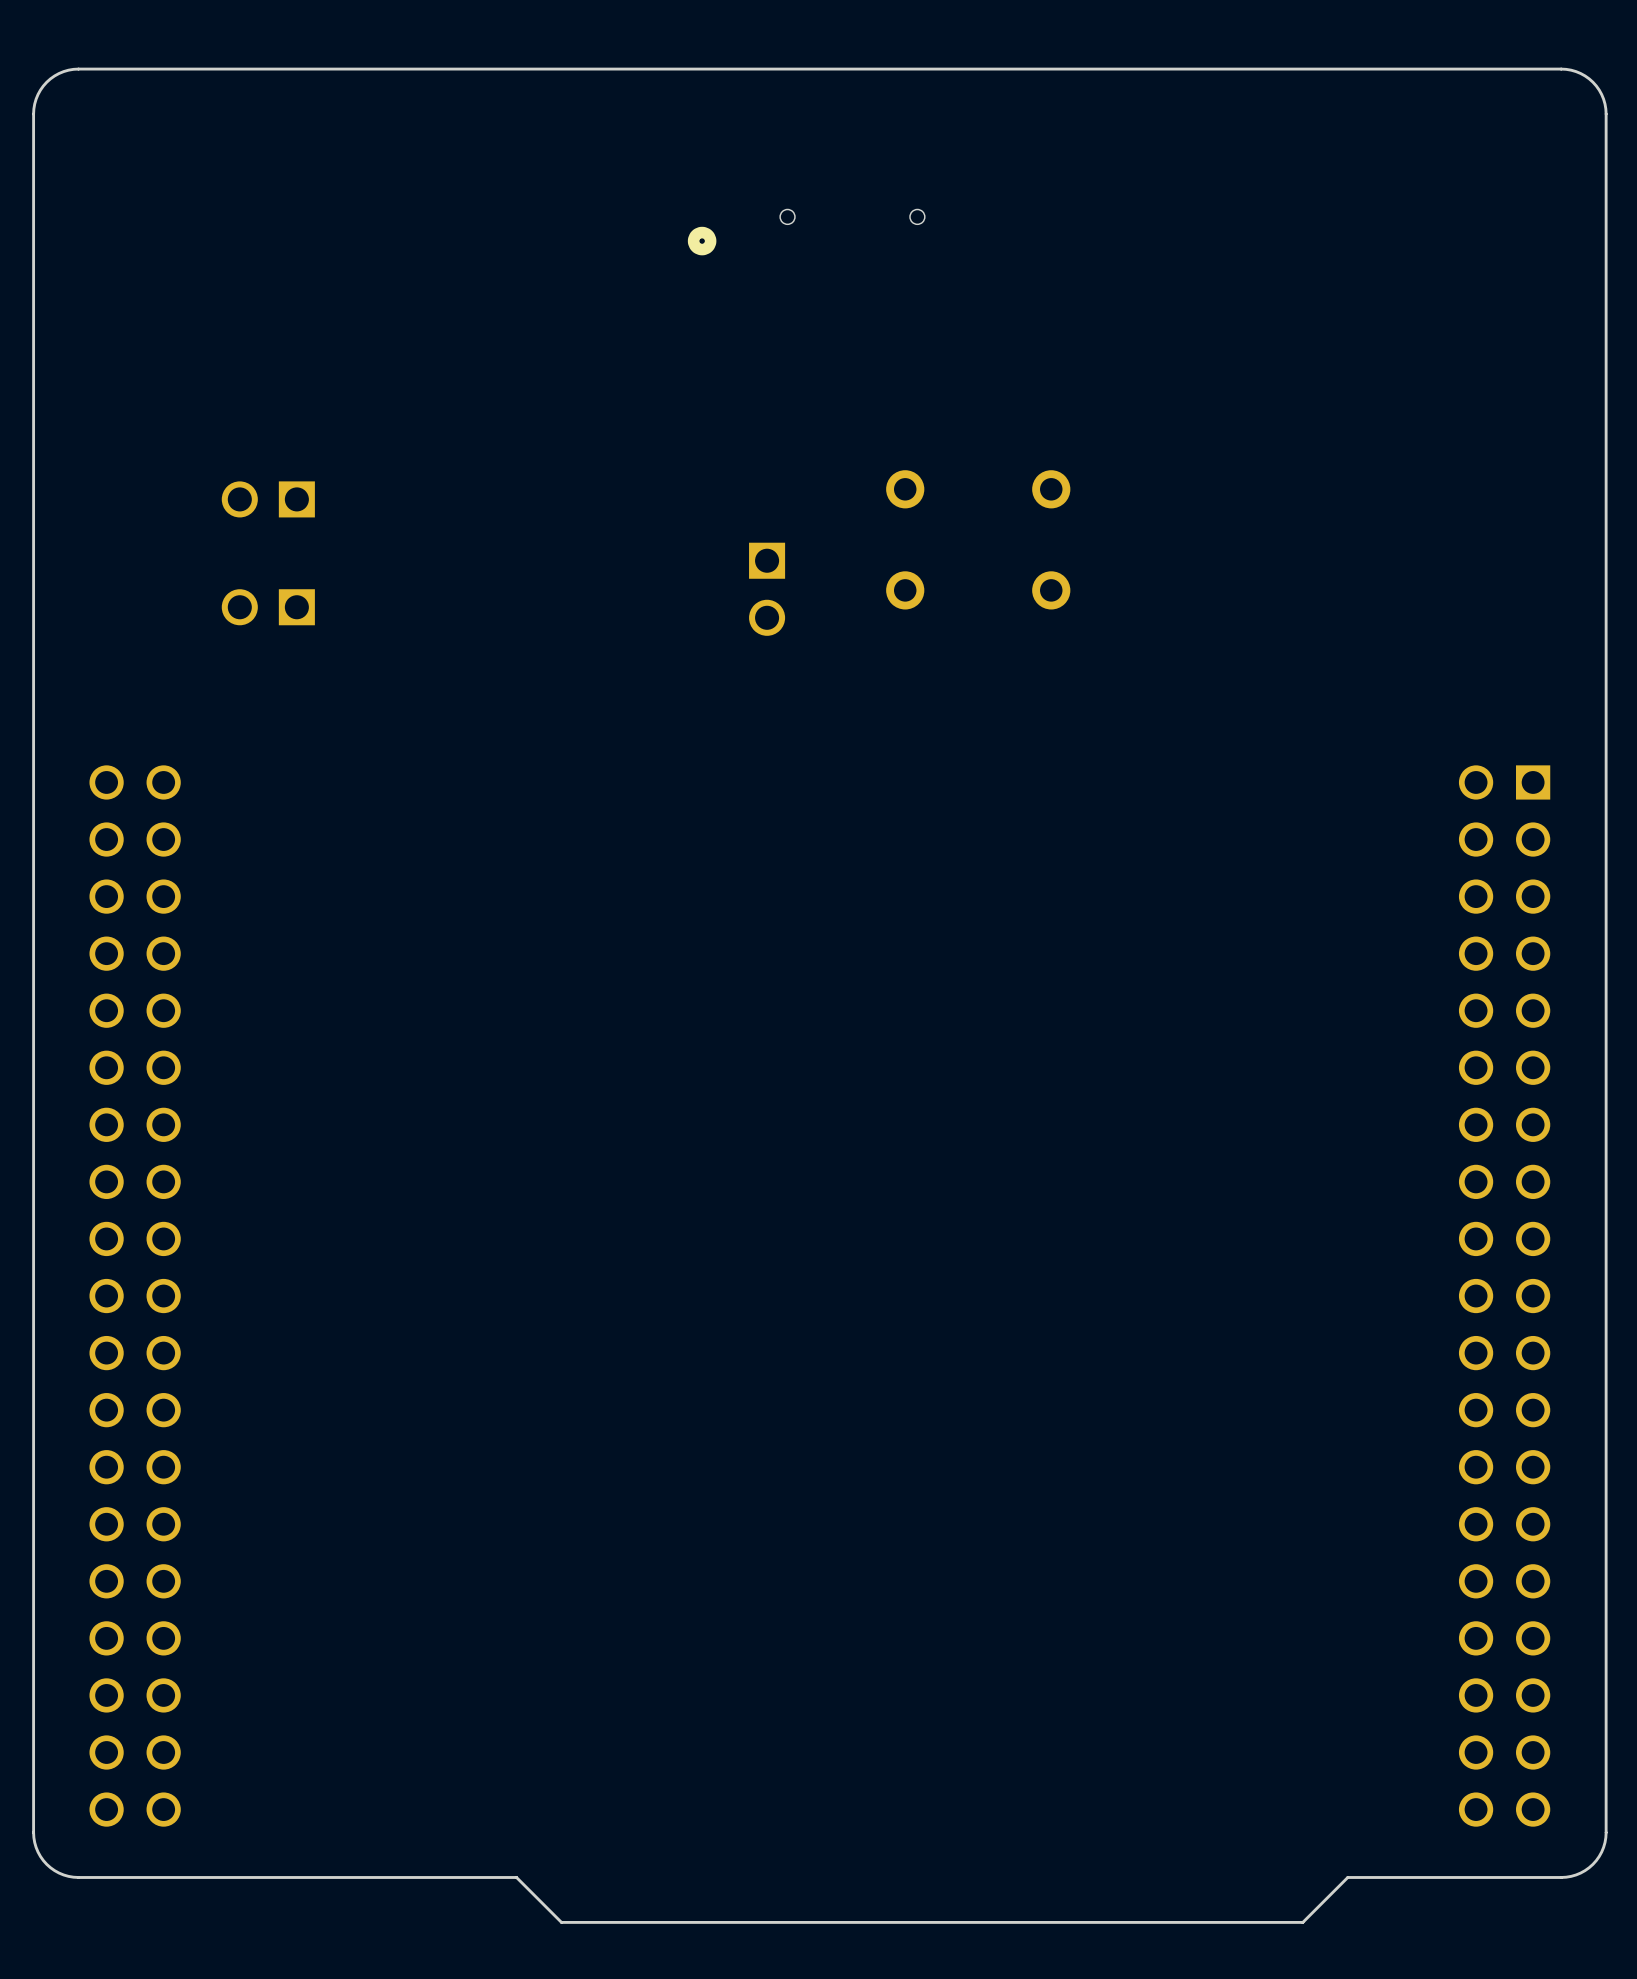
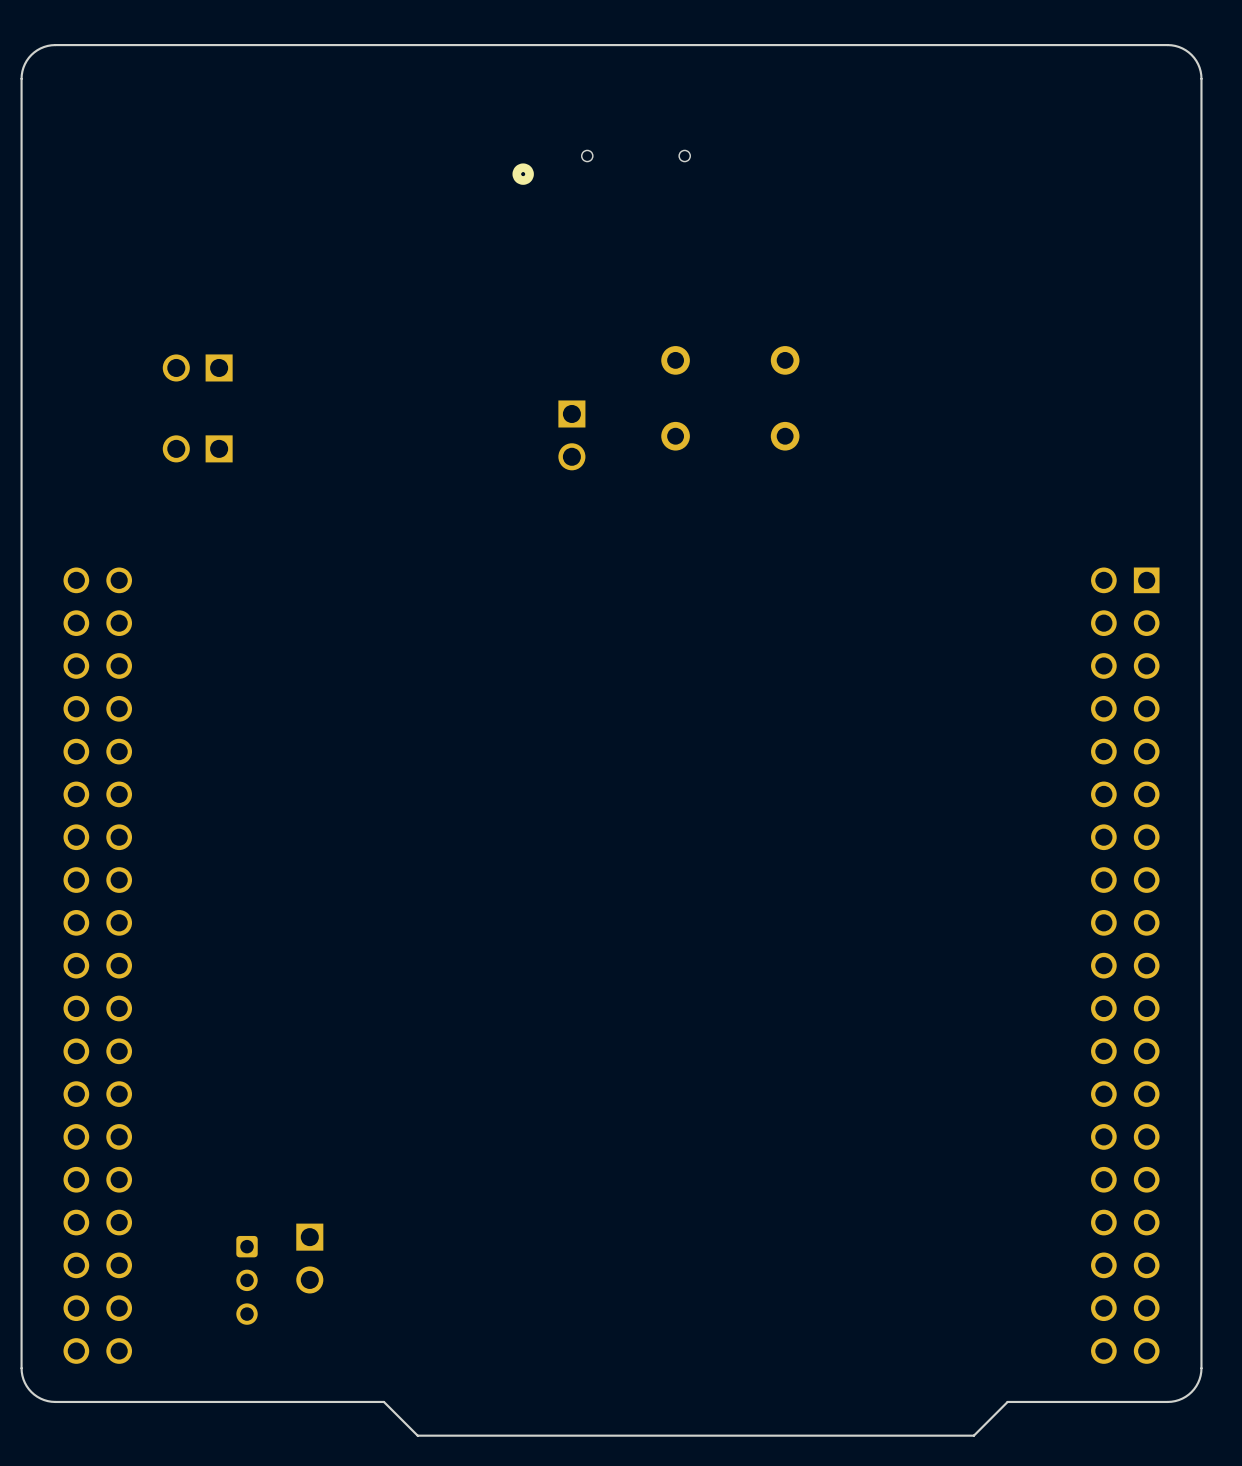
part: none -> (309, 1258)
part: none -> (247, 1280)

